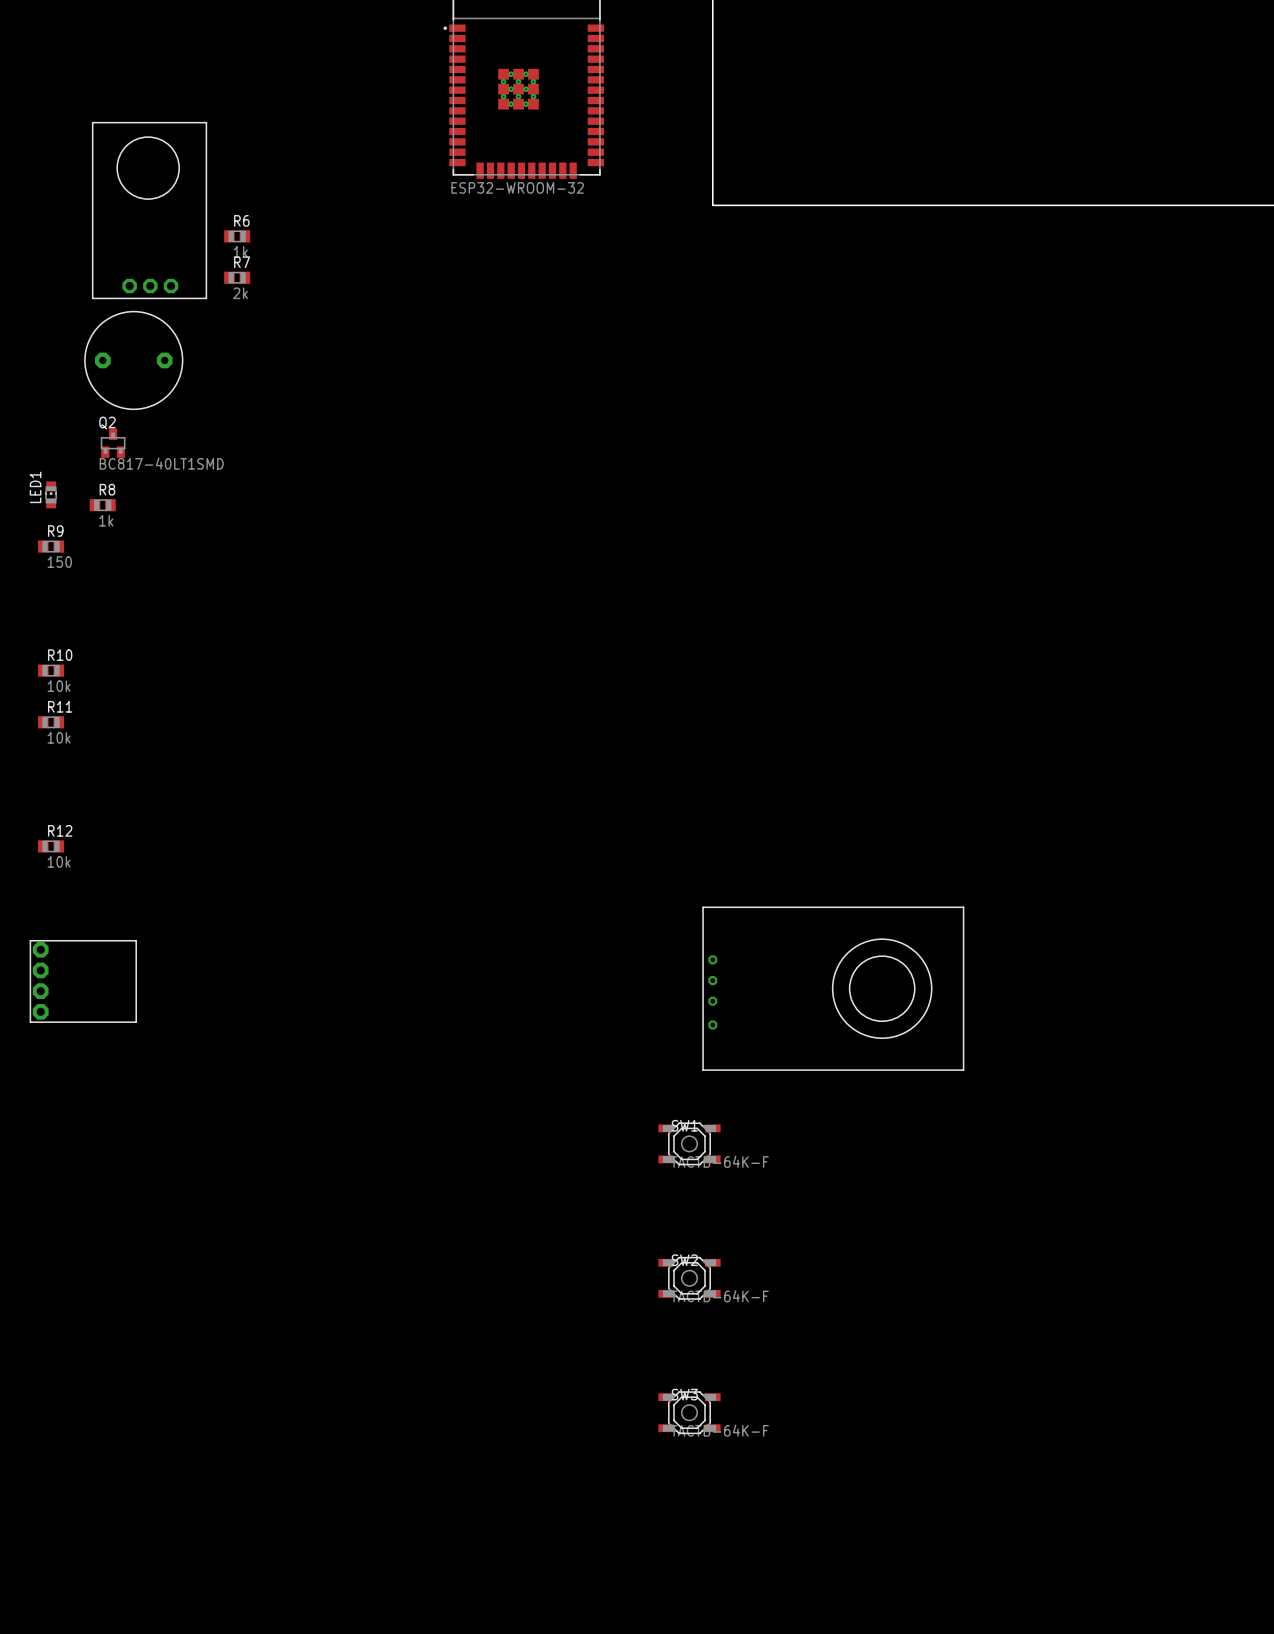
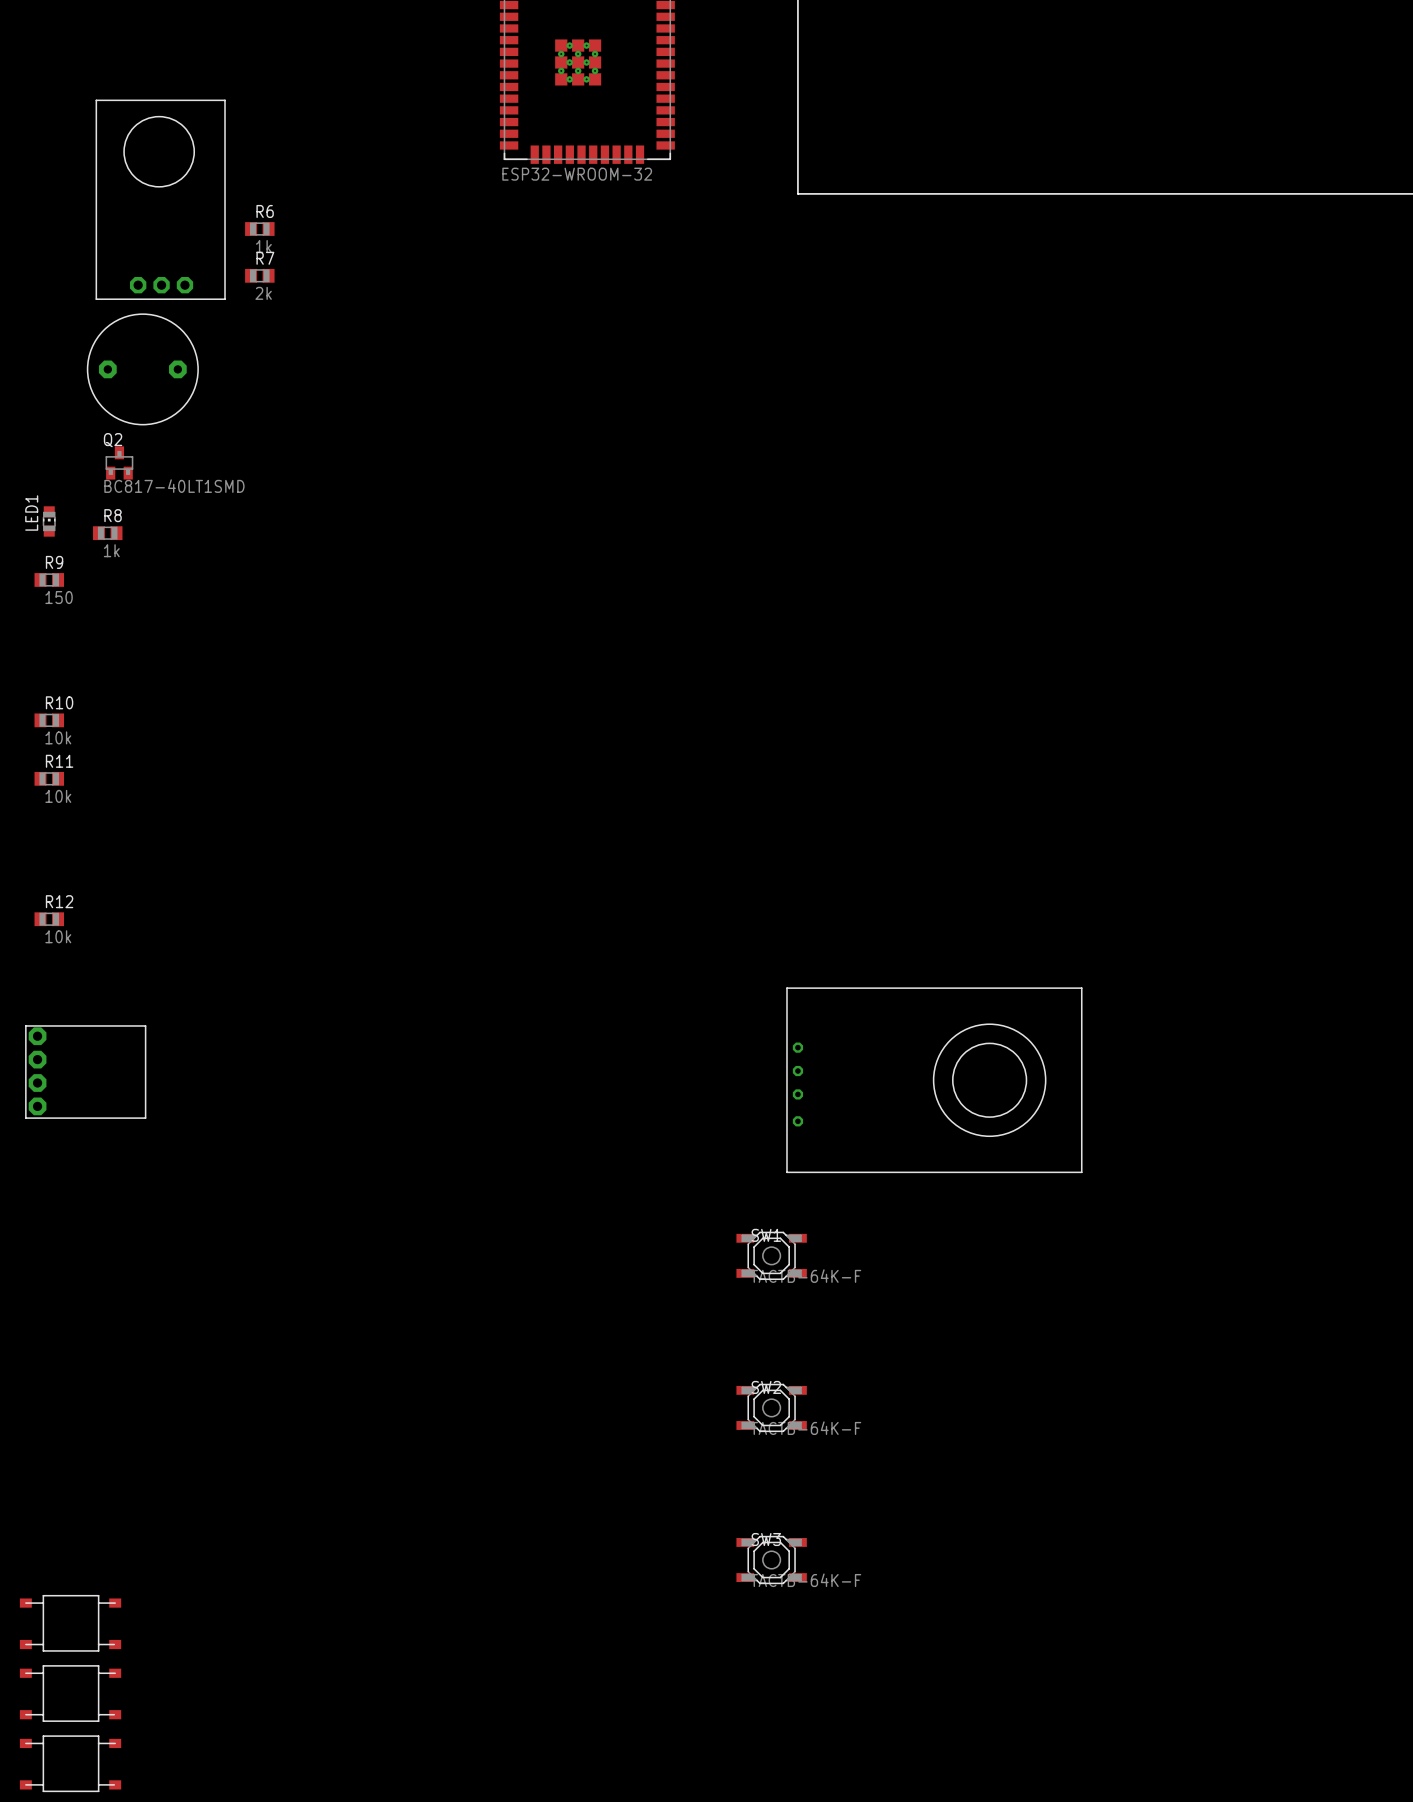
part: none -> (70, 1623)
part: none -> (70, 1693)
part: none -> (70, 1763)

